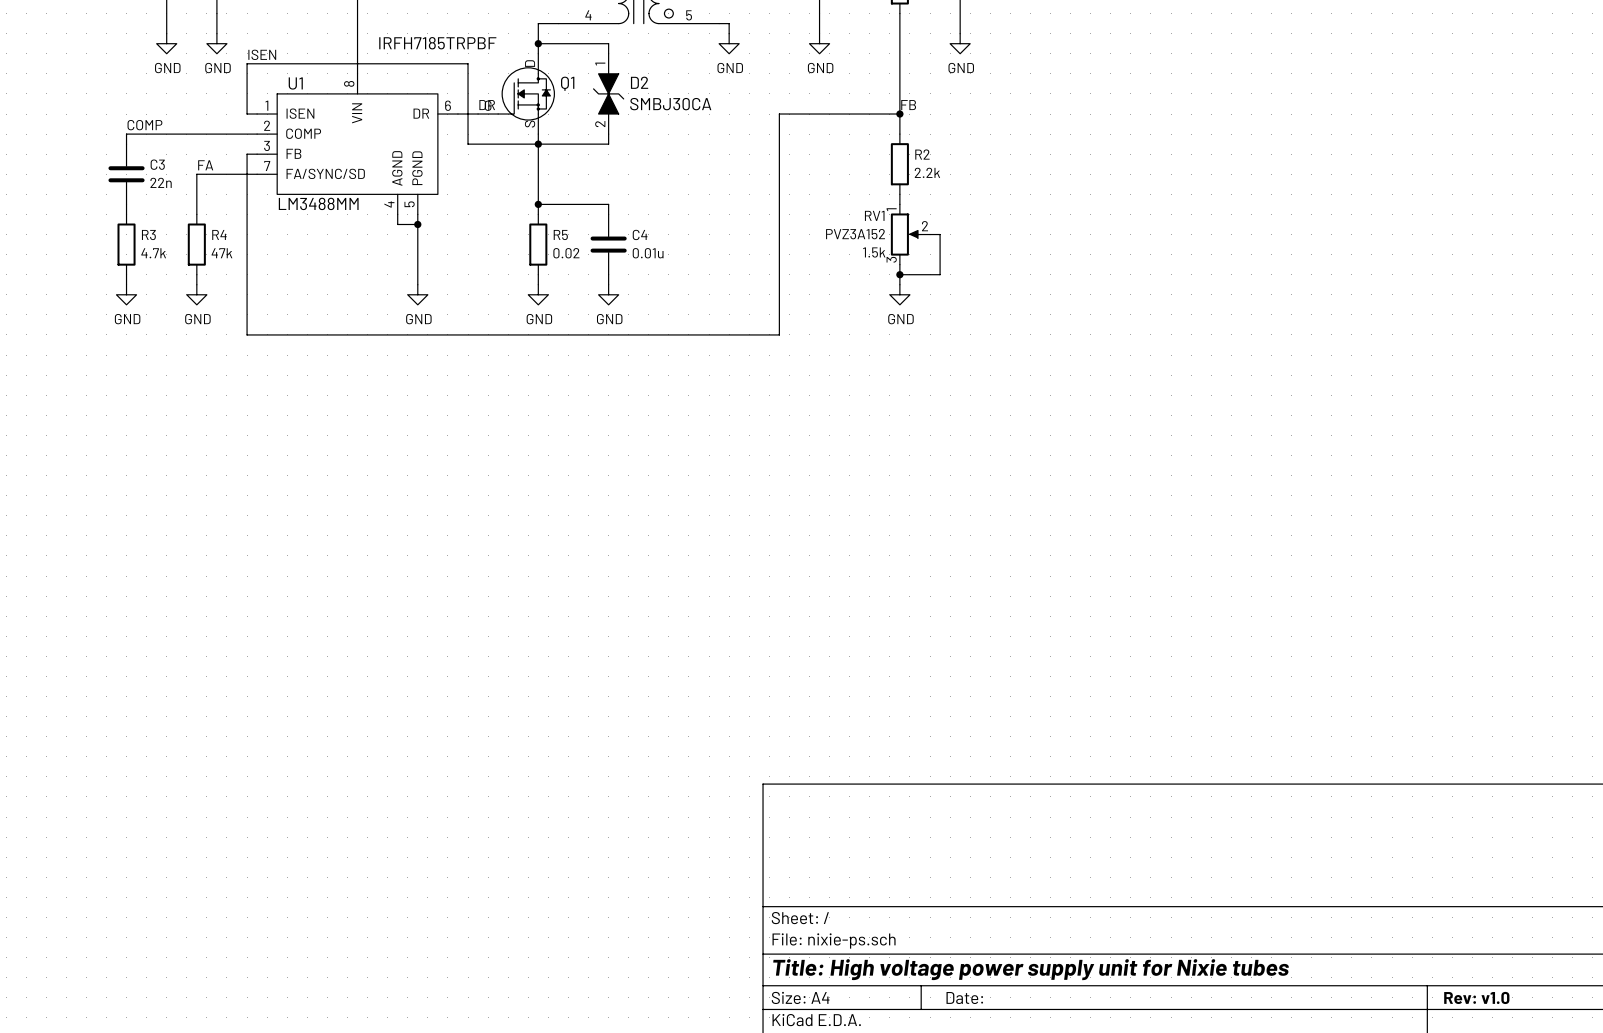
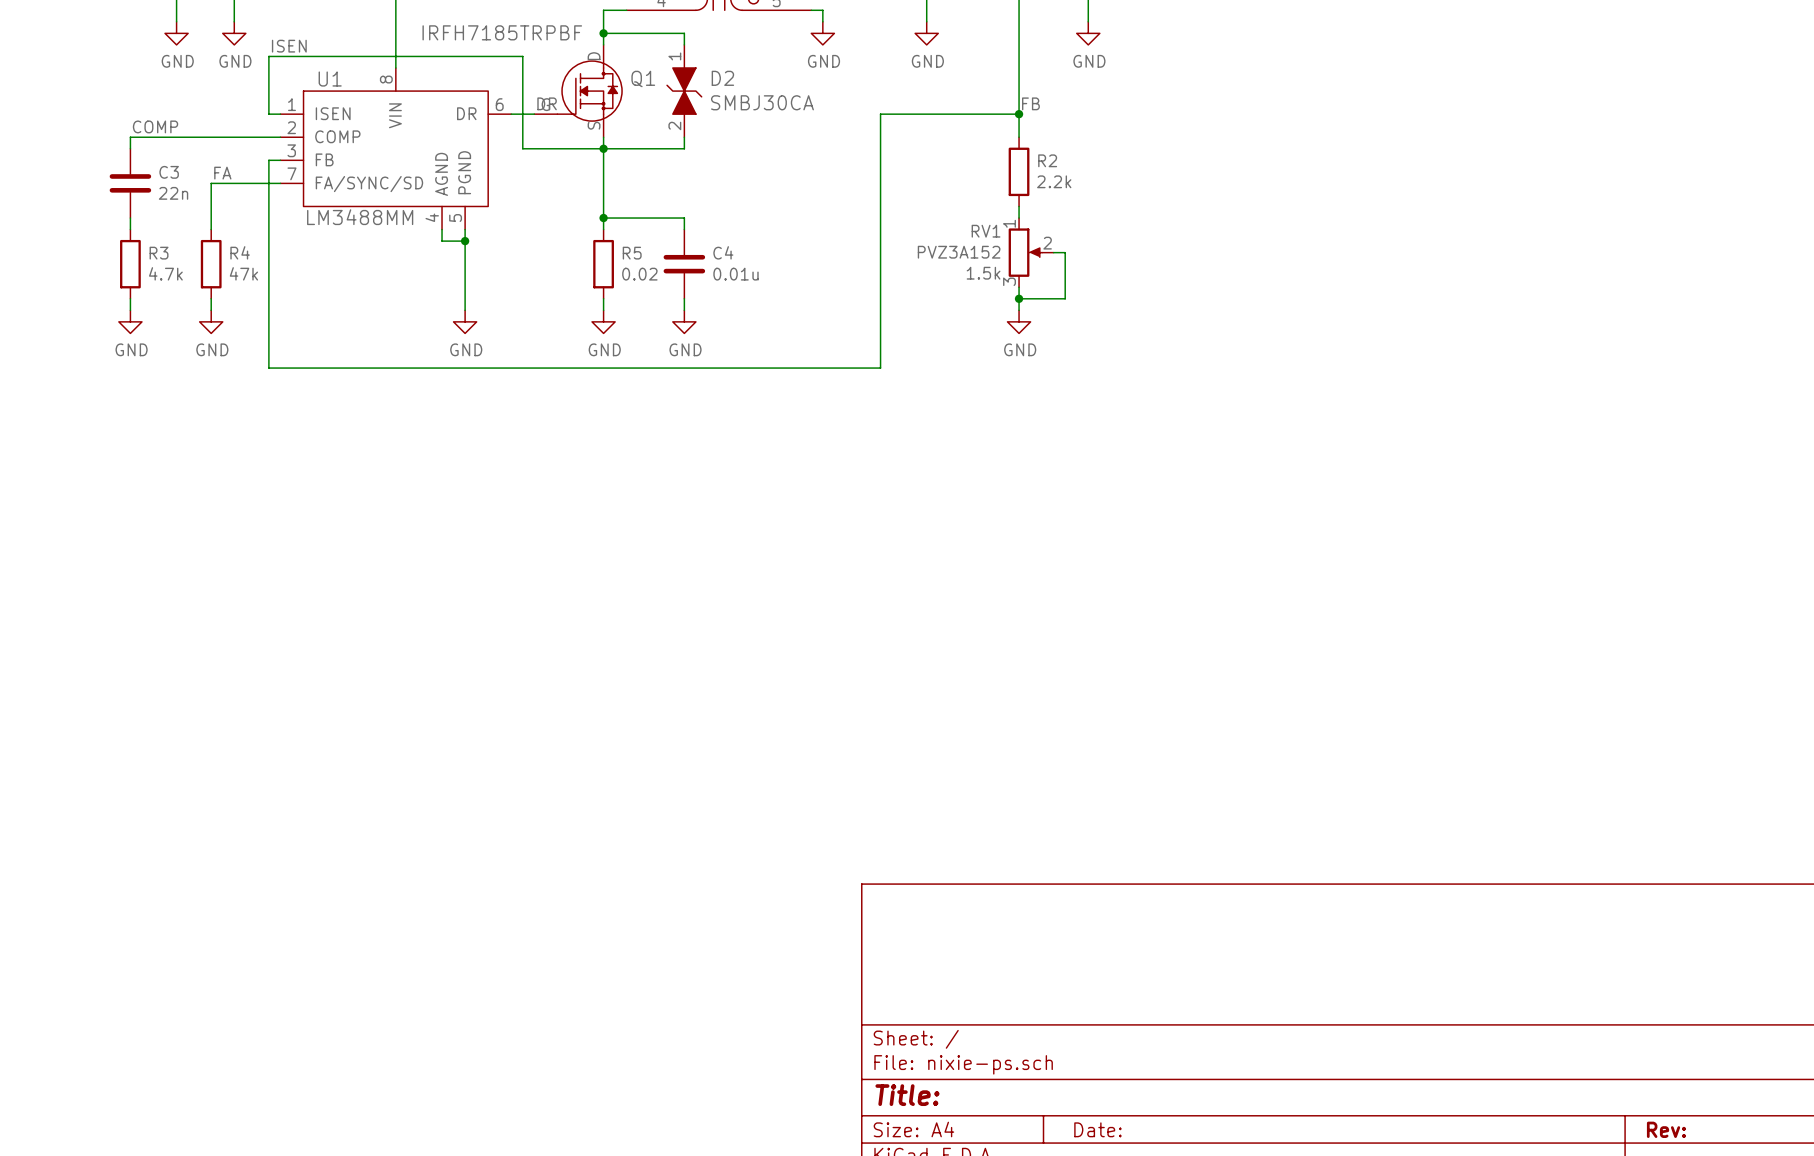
title block: Title: High voltage power supply unit for Nixie tubes (1031, 969) -> Title: (907, 1095)
title block: Rev: v1.0 (1476, 997) -> Rev: (1666, 1129)

